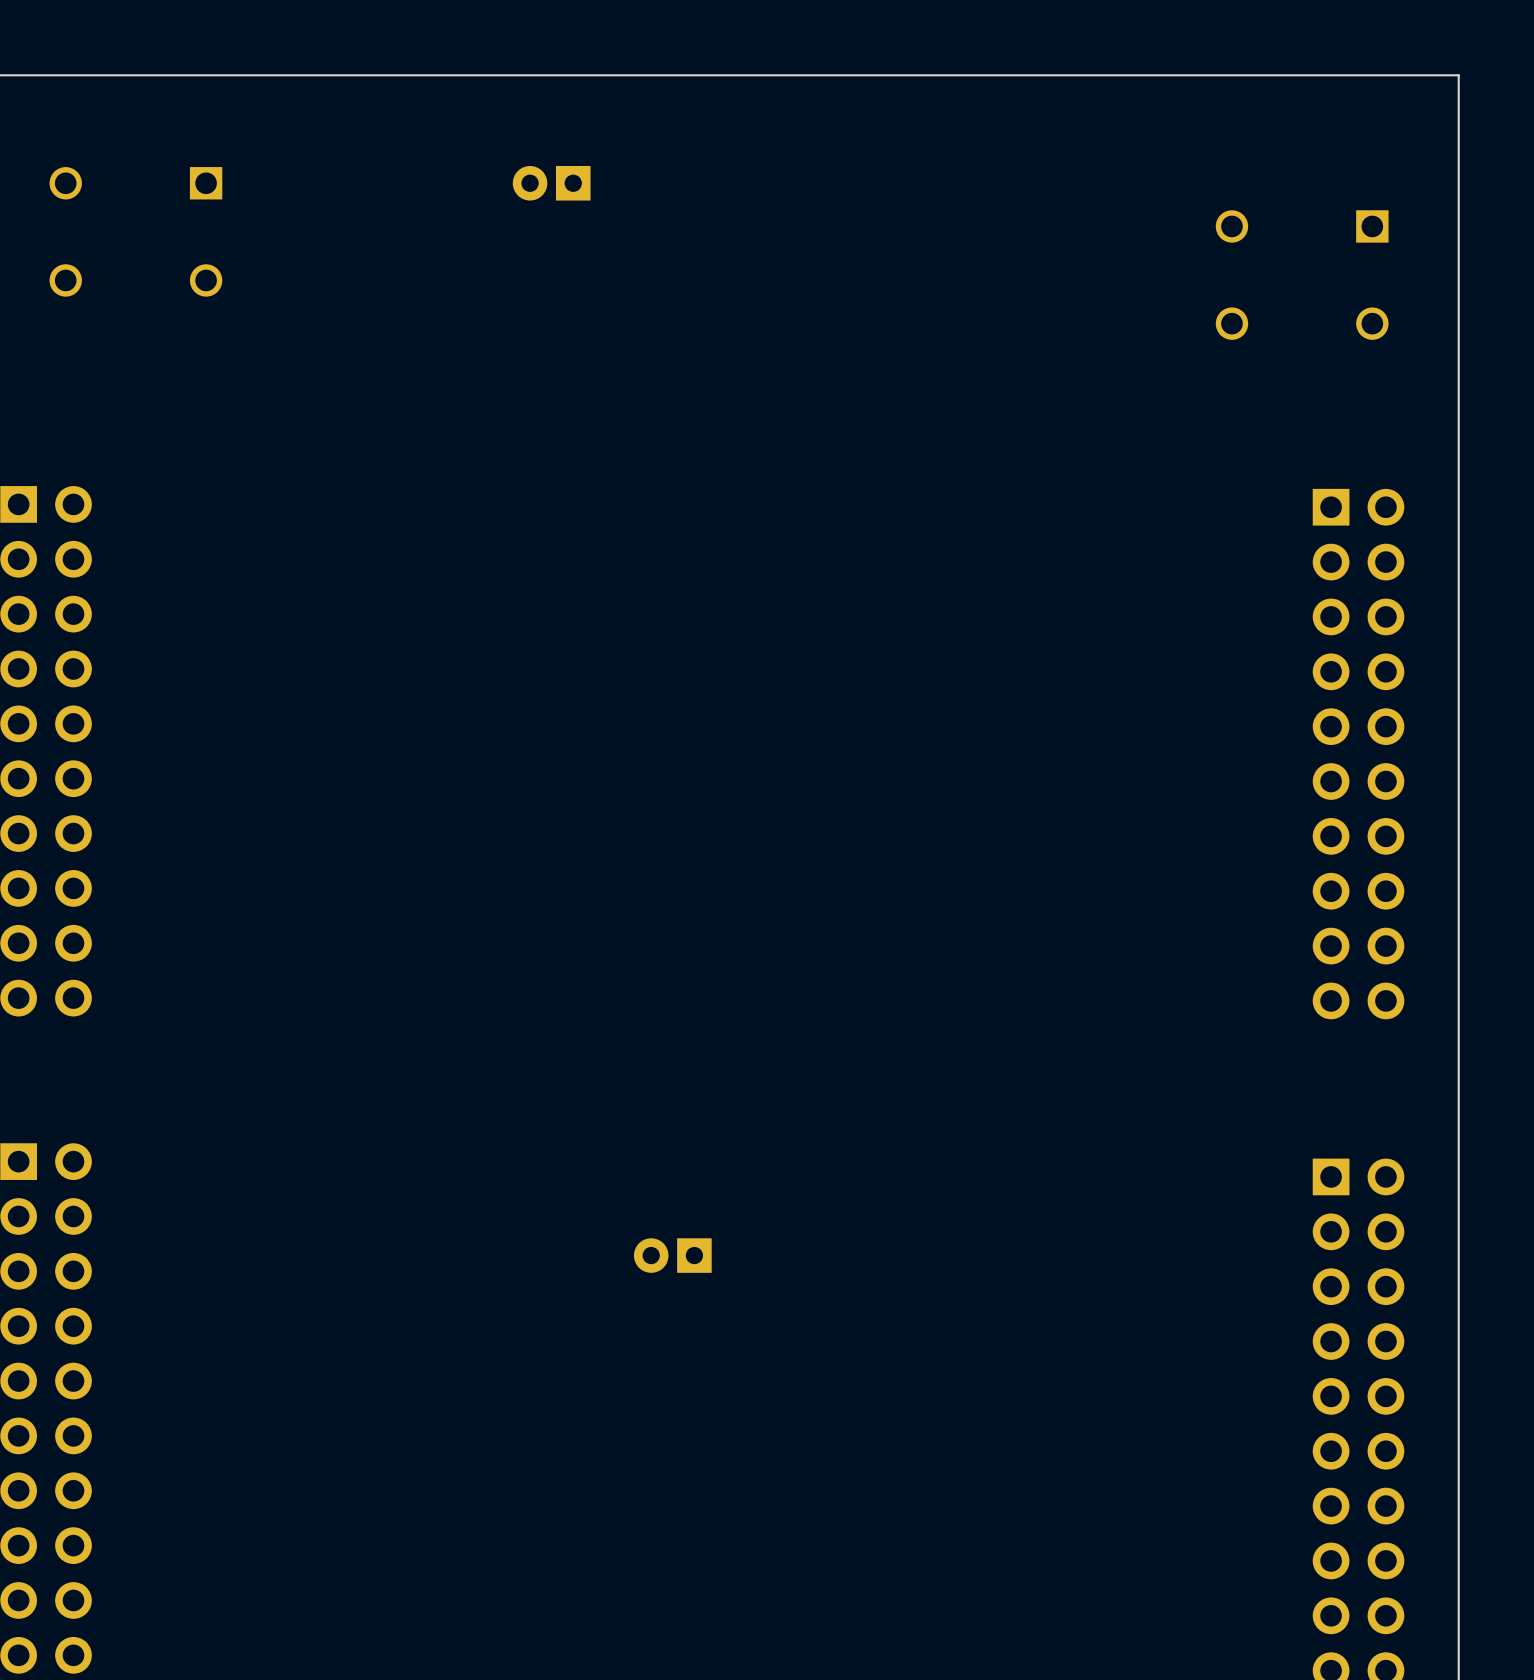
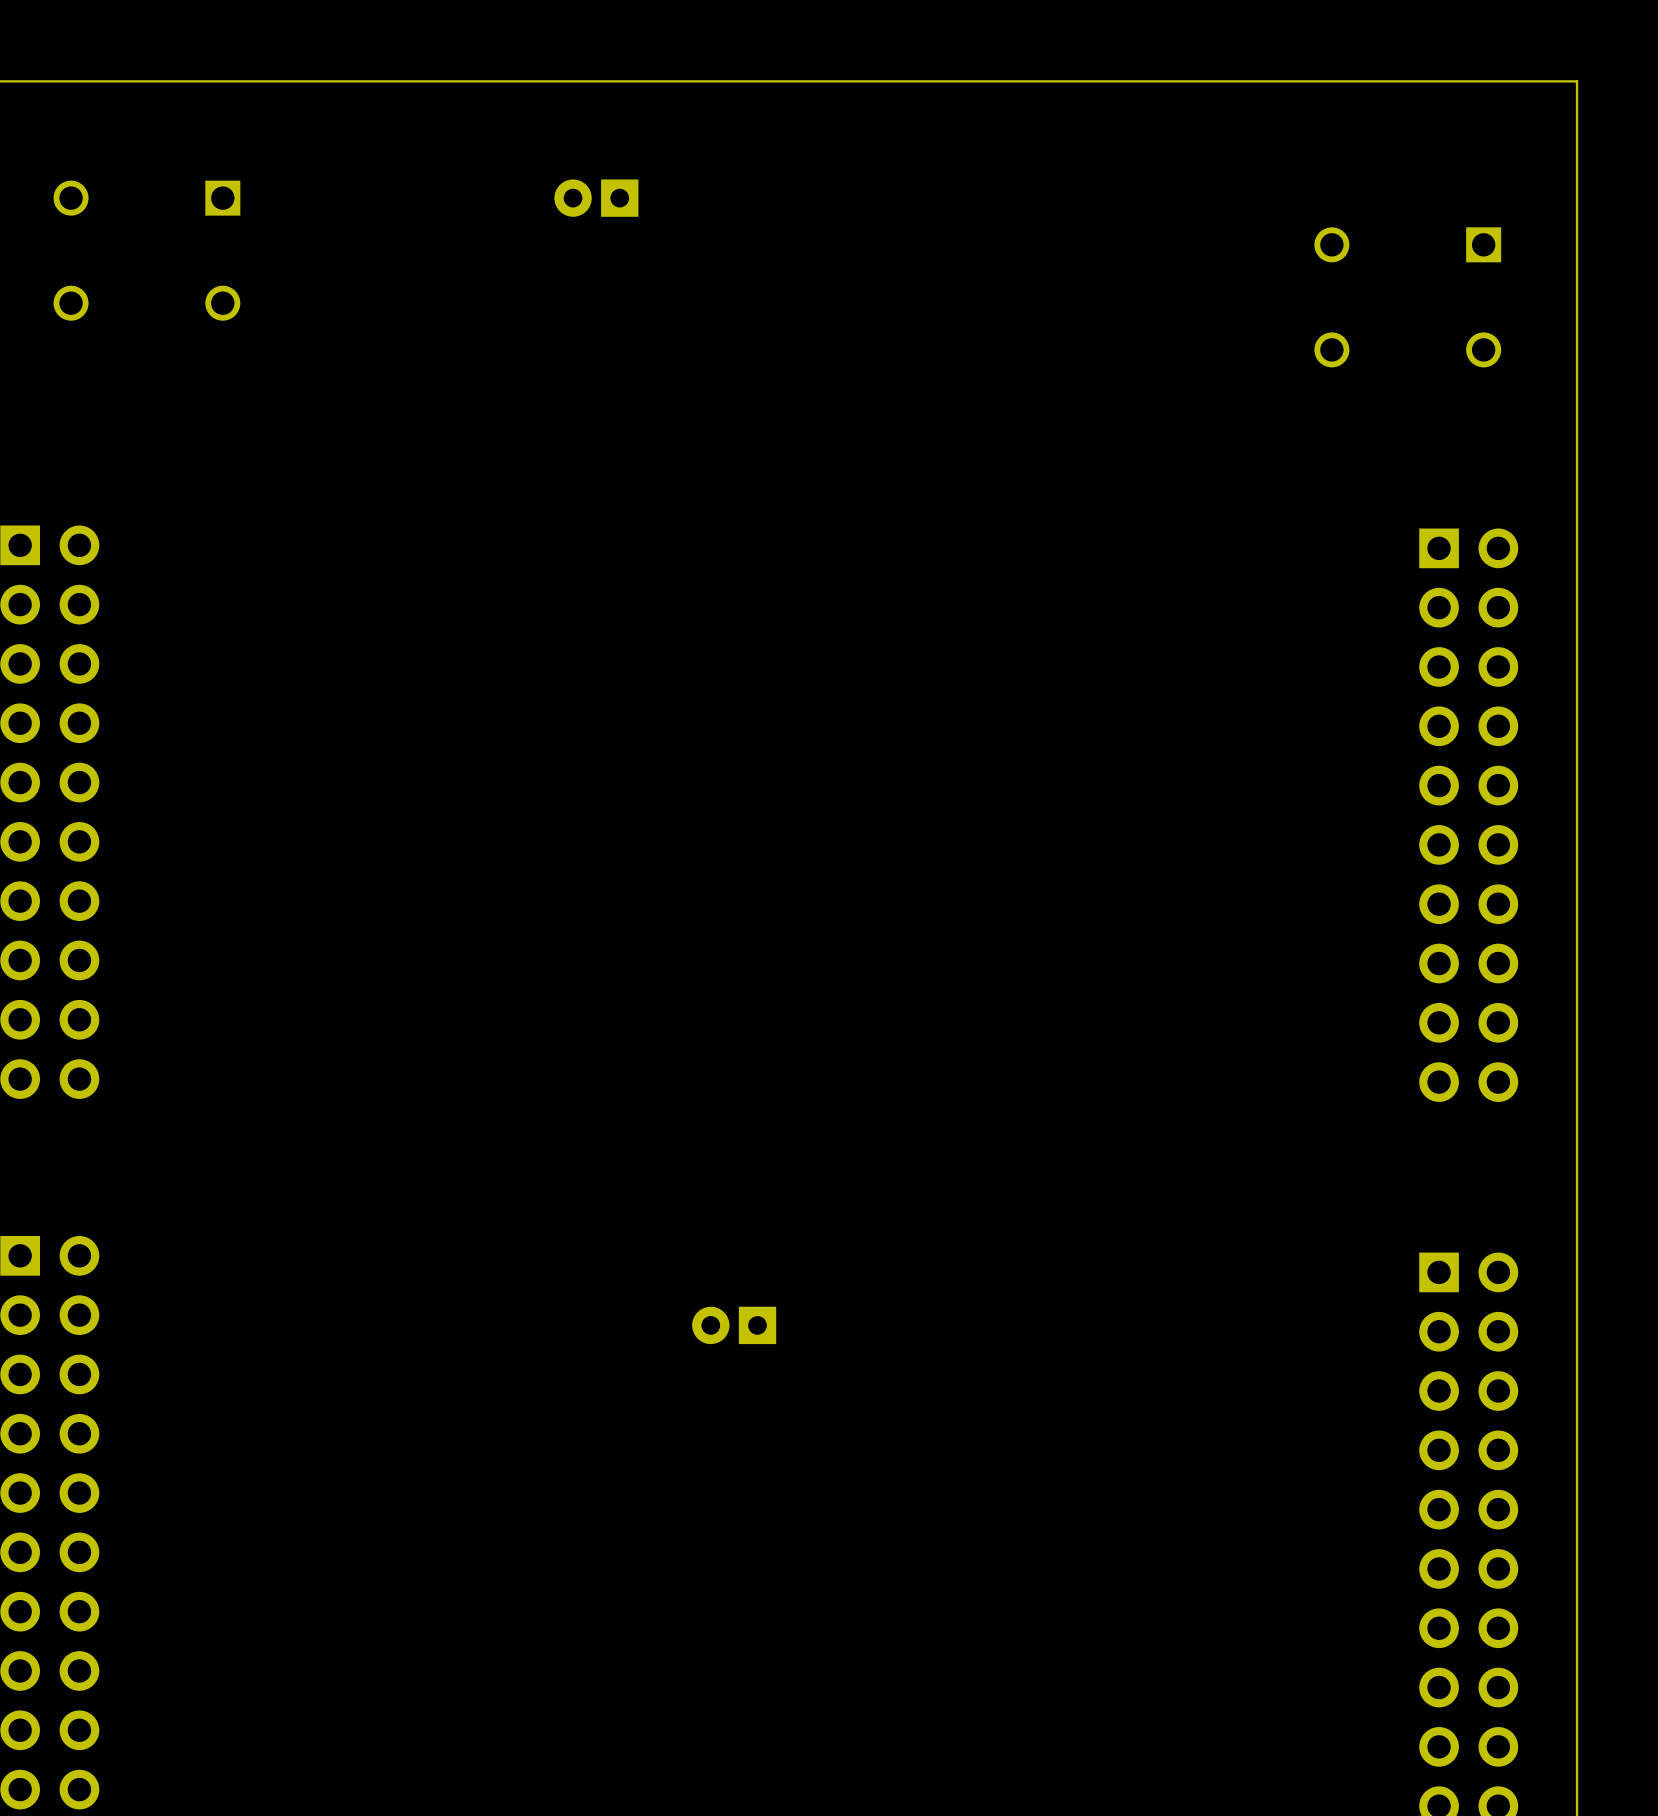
part position: (672, 1255) -> (734, 1325)

